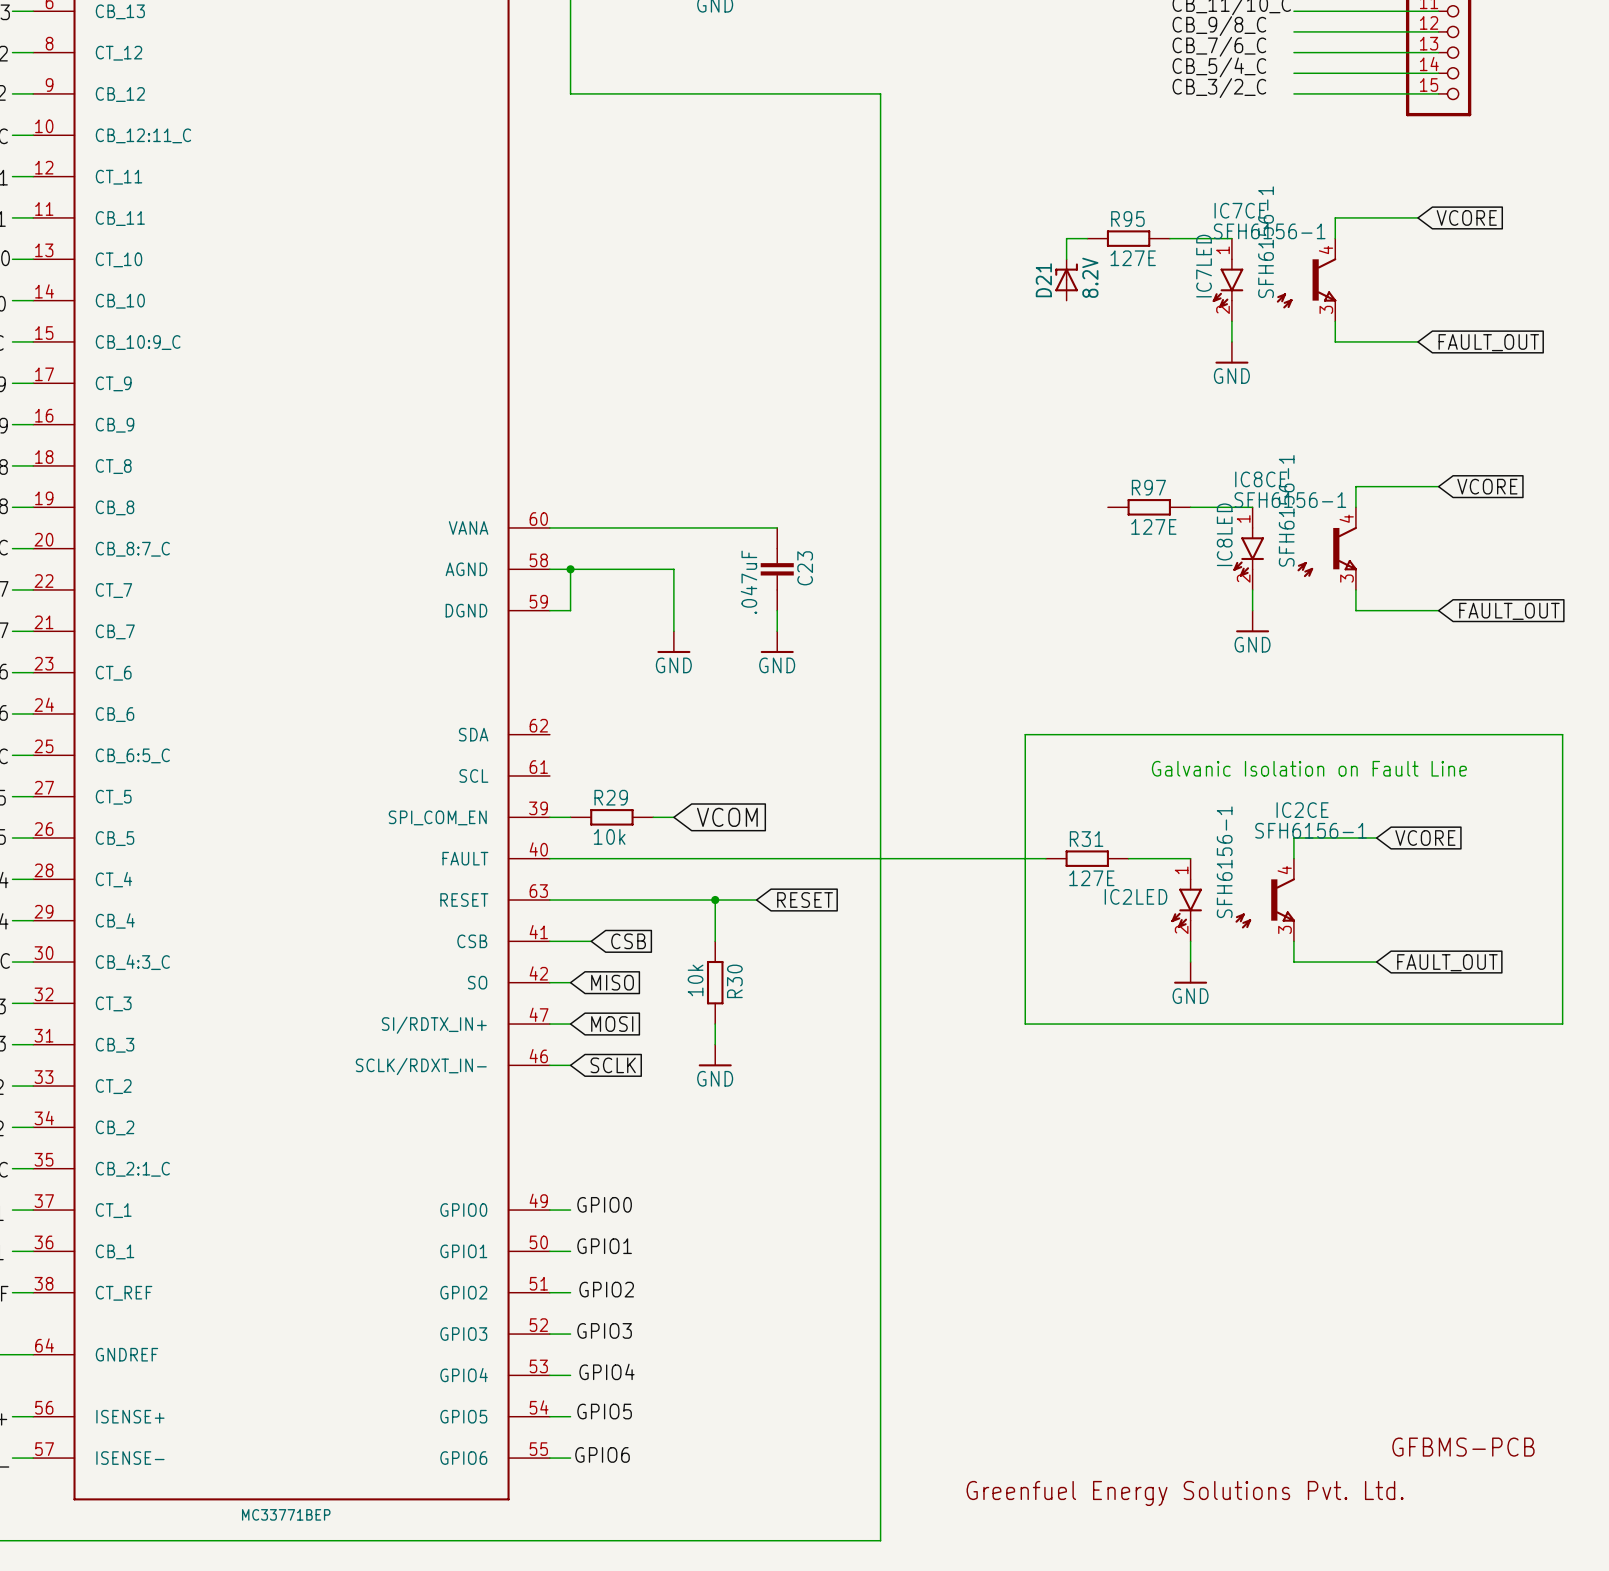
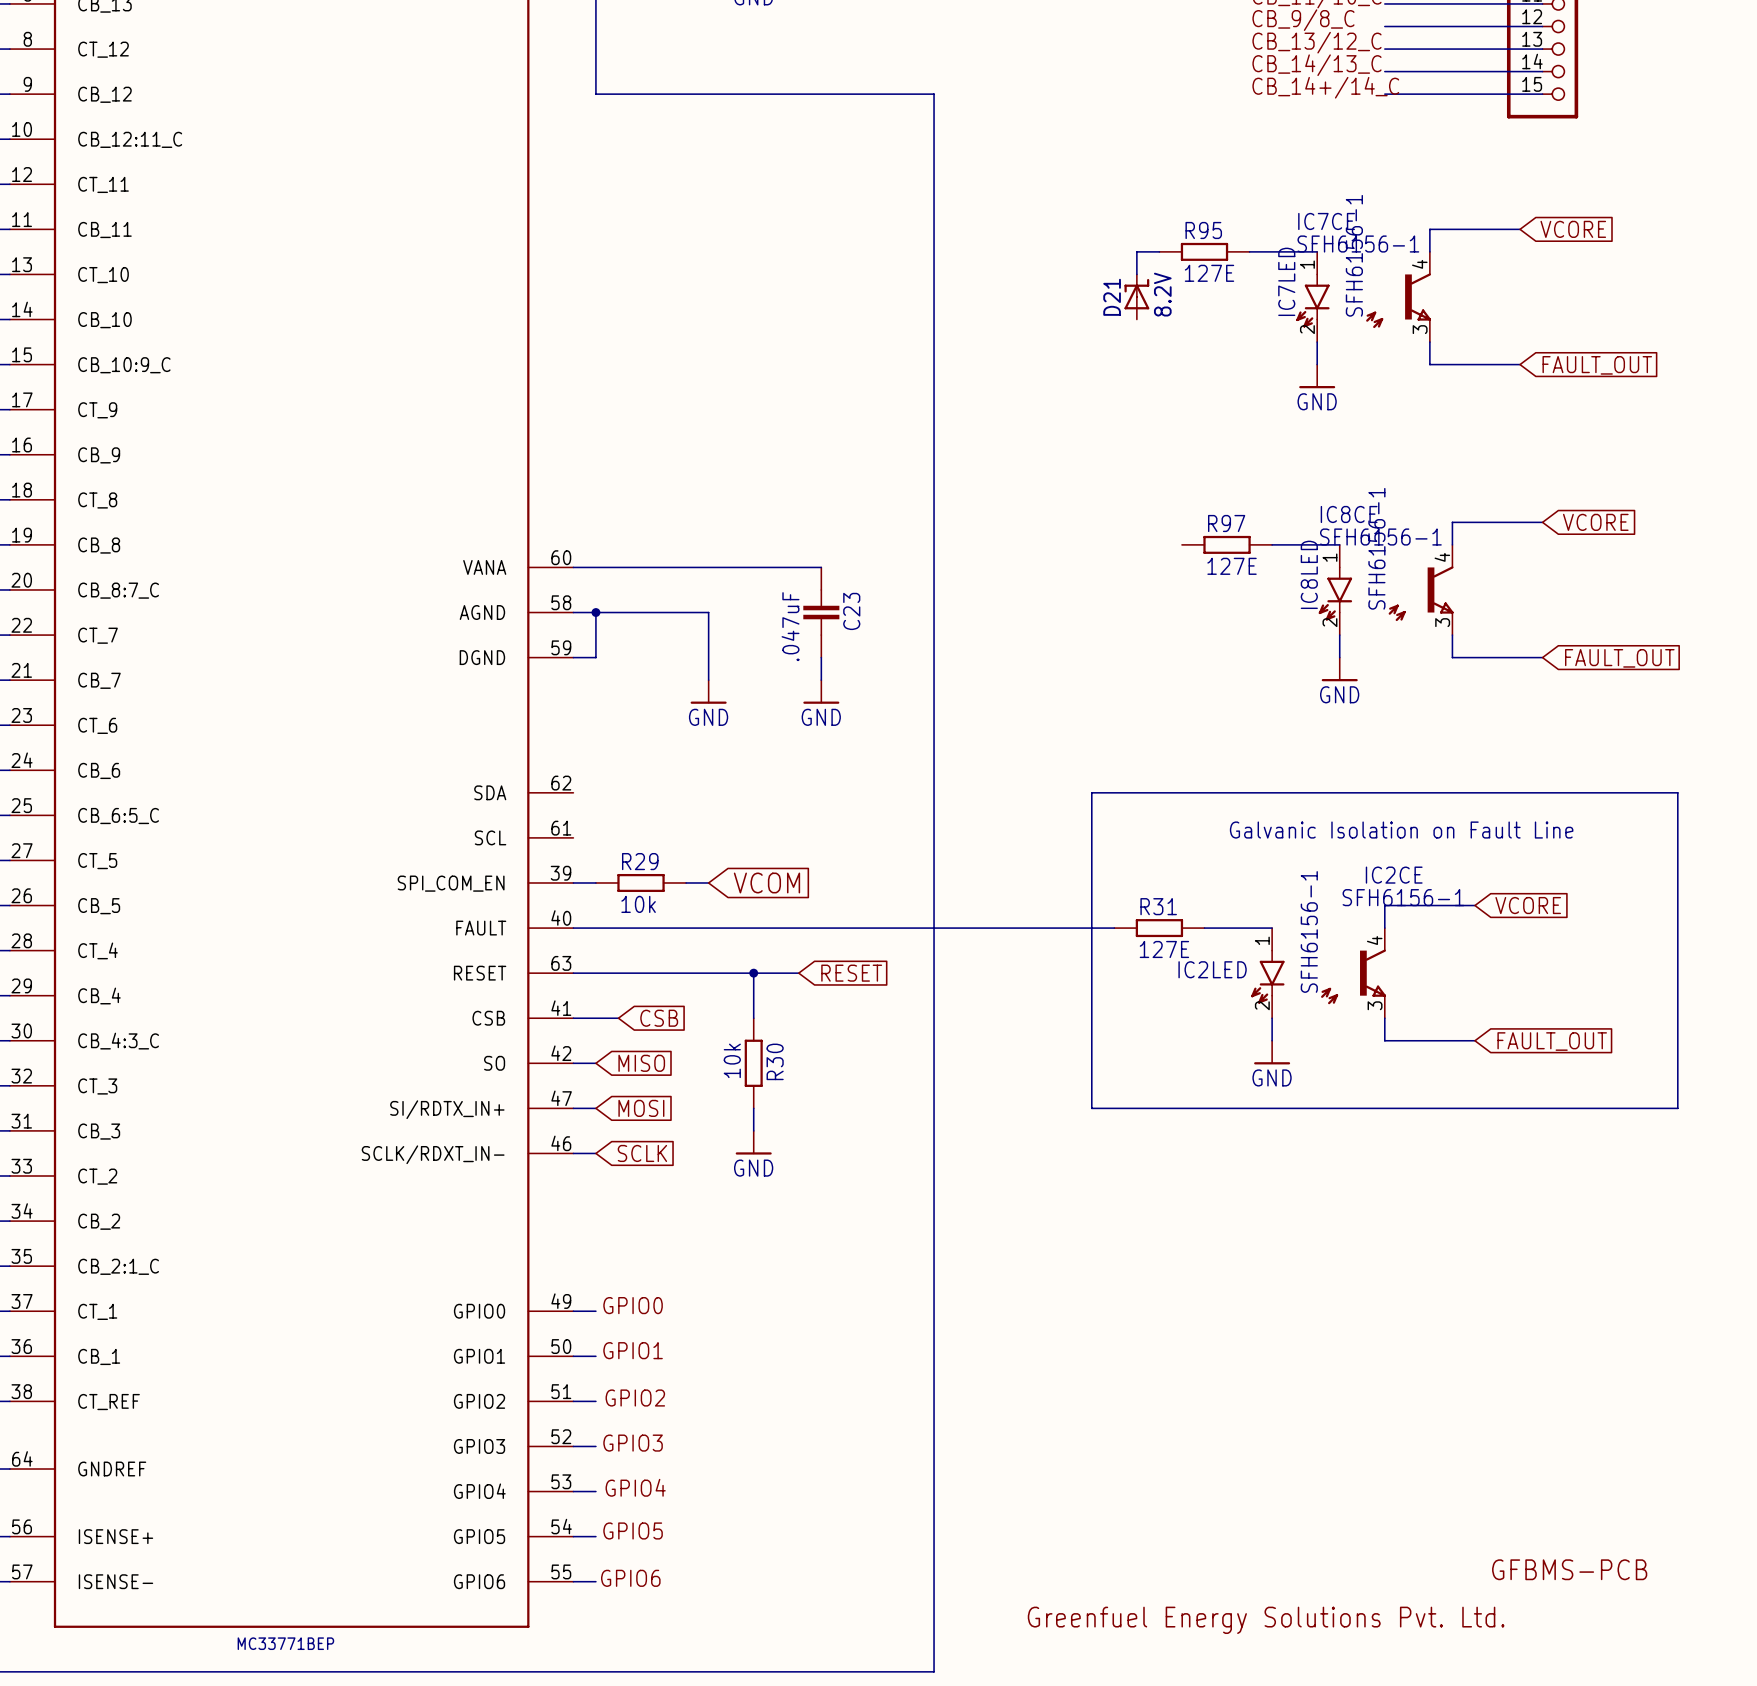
label: CB_7/6_C (1219, 46) -> CB_13/12_C (1317, 42)
label: CB_5/4_C (1219, 67) -> CB_14/13_C (1317, 65)
label: CB_3/2_C (1219, 88) -> CB_14+/14_C (1325, 87)

